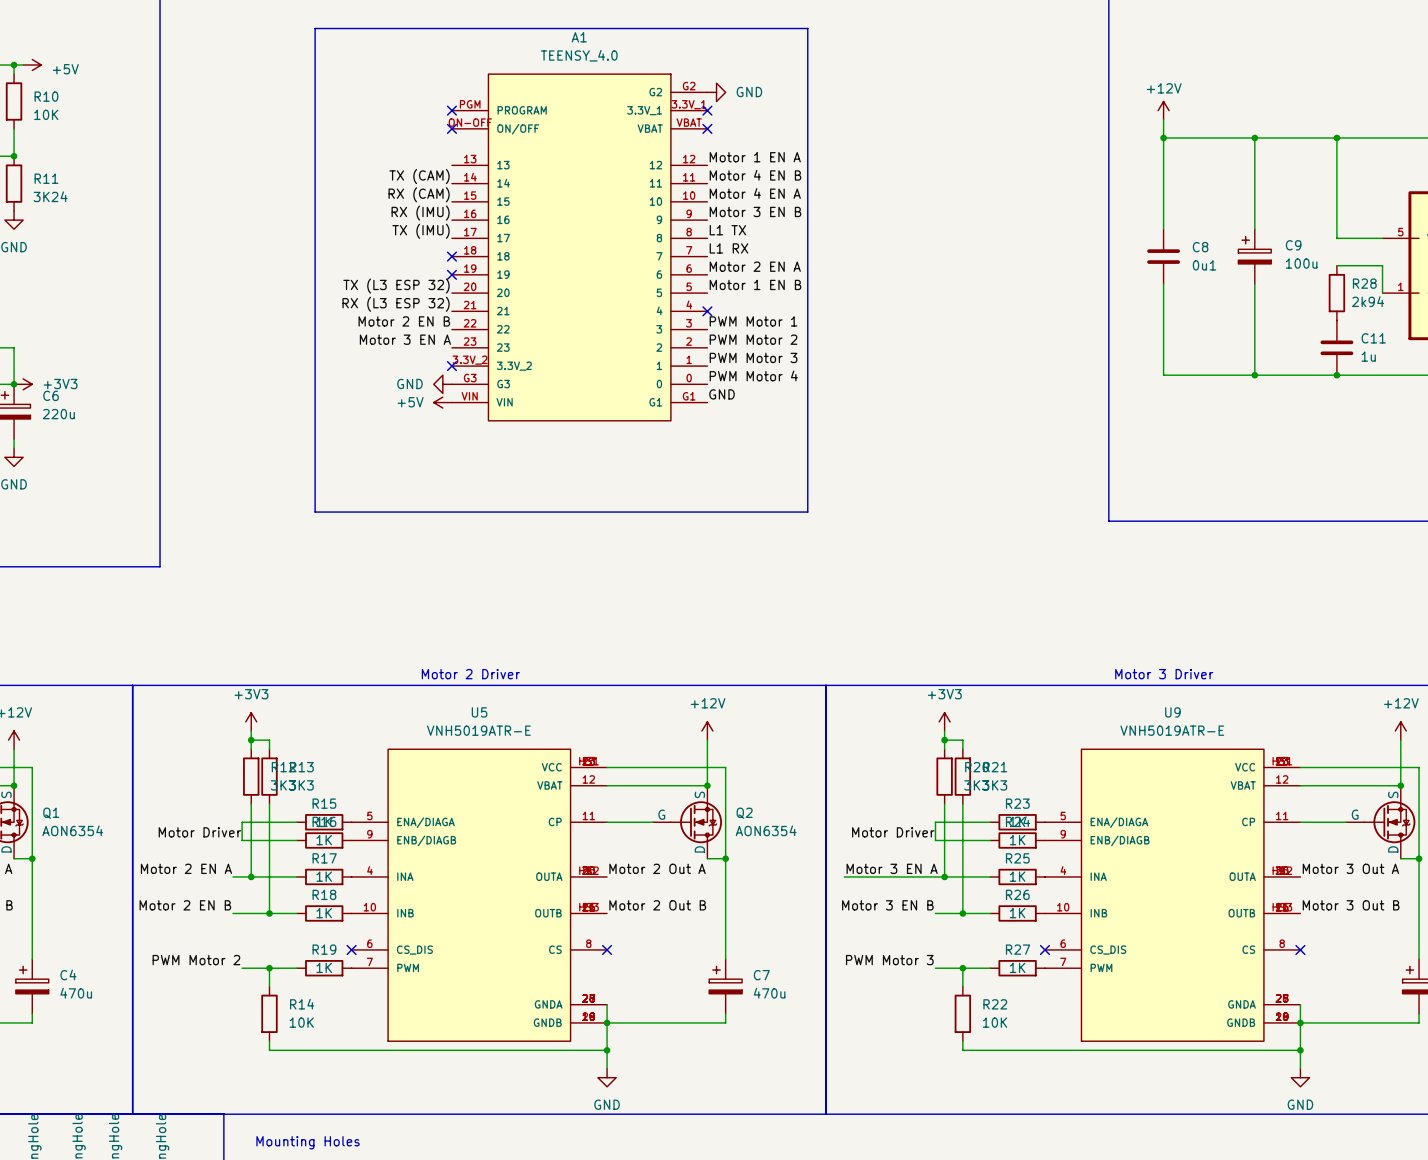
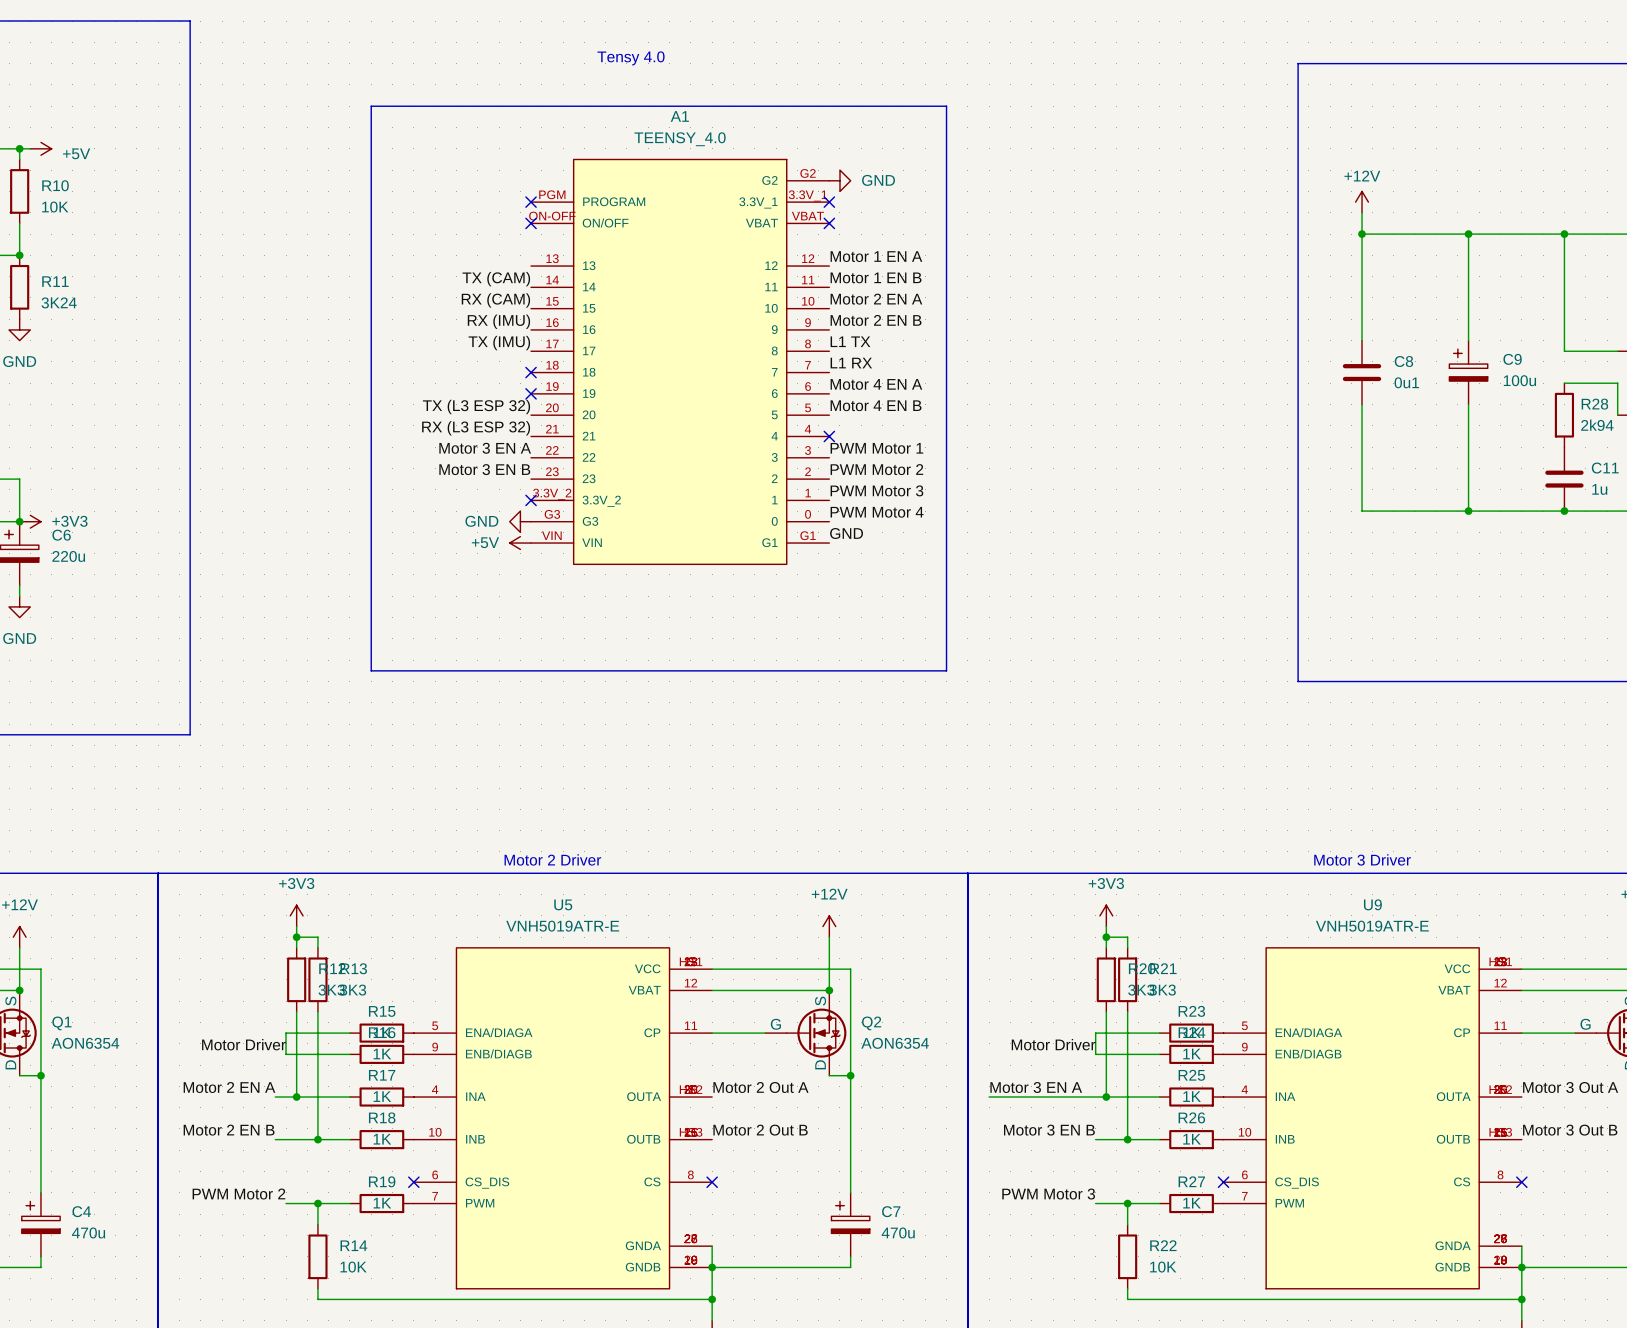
label: Motor 4 EN B (755, 175) -> Motor 1 EN B (876, 277)
label: Motor 4 EN A (755, 193) -> Motor 2 EN A (876, 299)
label: Motor 3 EN B (755, 211) -> Motor 2 EN B (876, 320)
label: Motor 2 EN A (755, 266) -> Motor 4 EN A (876, 384)
label: Motor 1 EN B (755, 284) -> Motor 4 EN B (876, 405)
label: Motor 2 EN B (404, 321) -> Motor 3 EN A (485, 448)
label: Motor 3 EN A (405, 339) -> Motor 3 EN B (484, 469)

